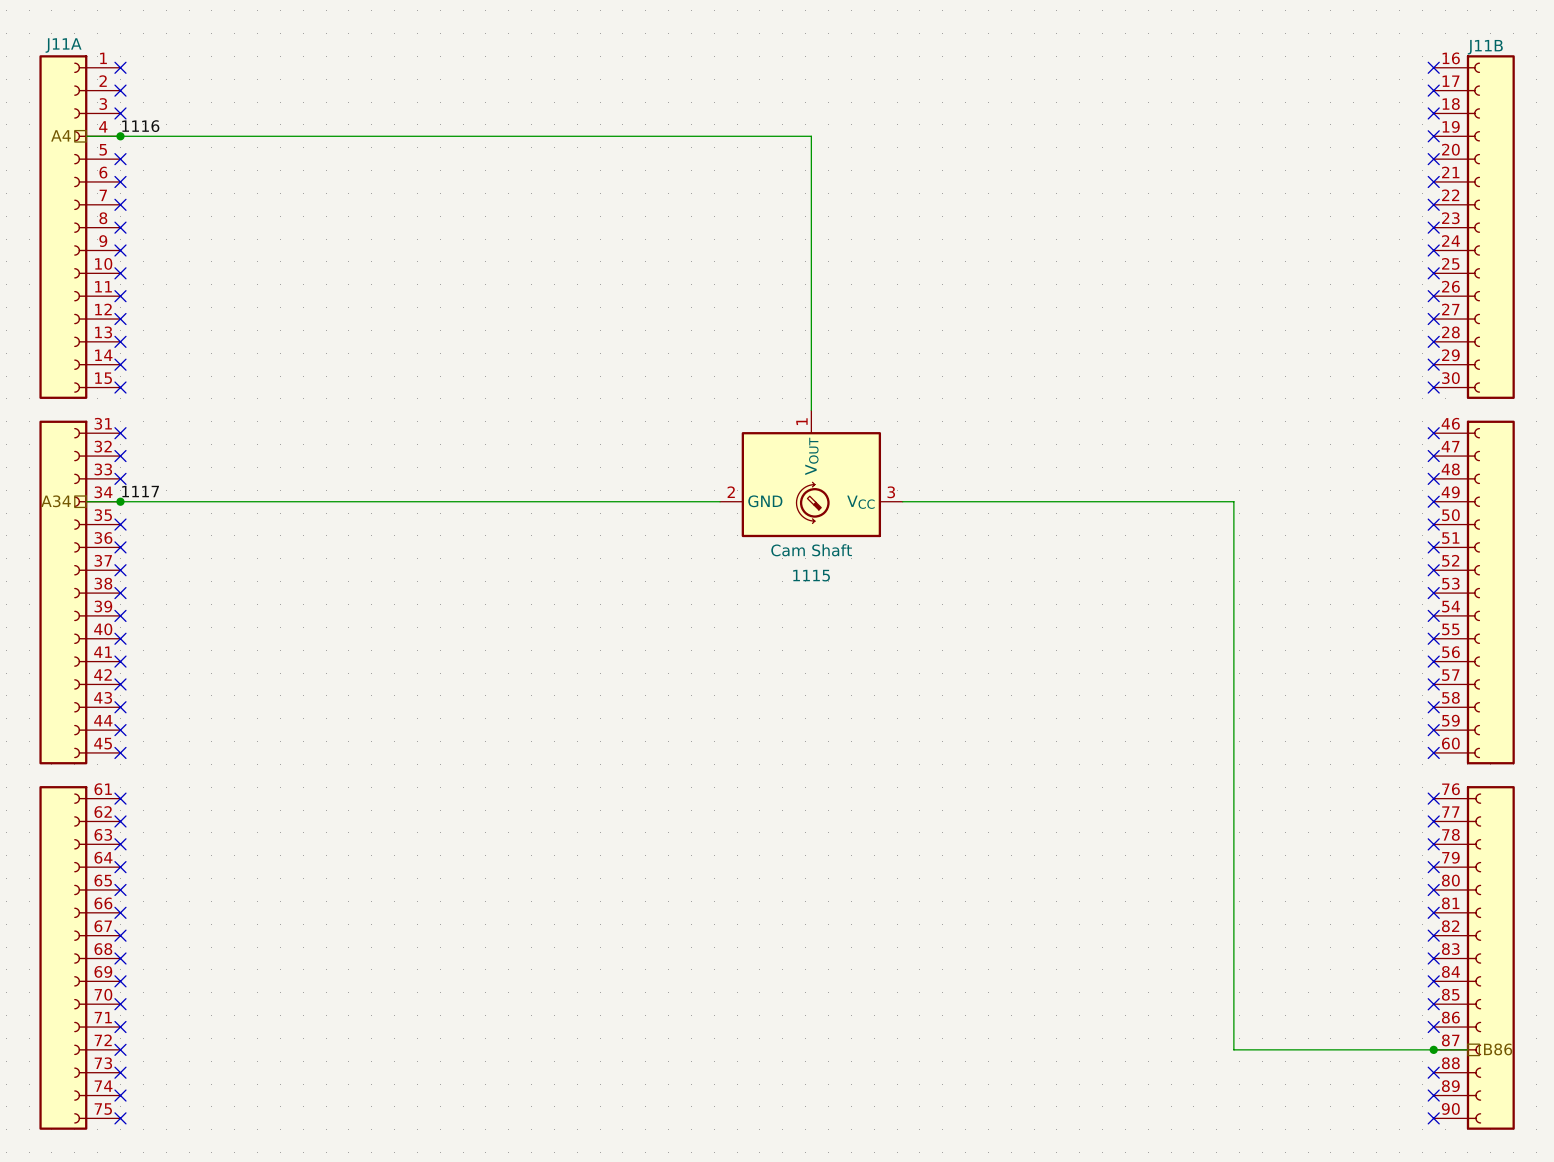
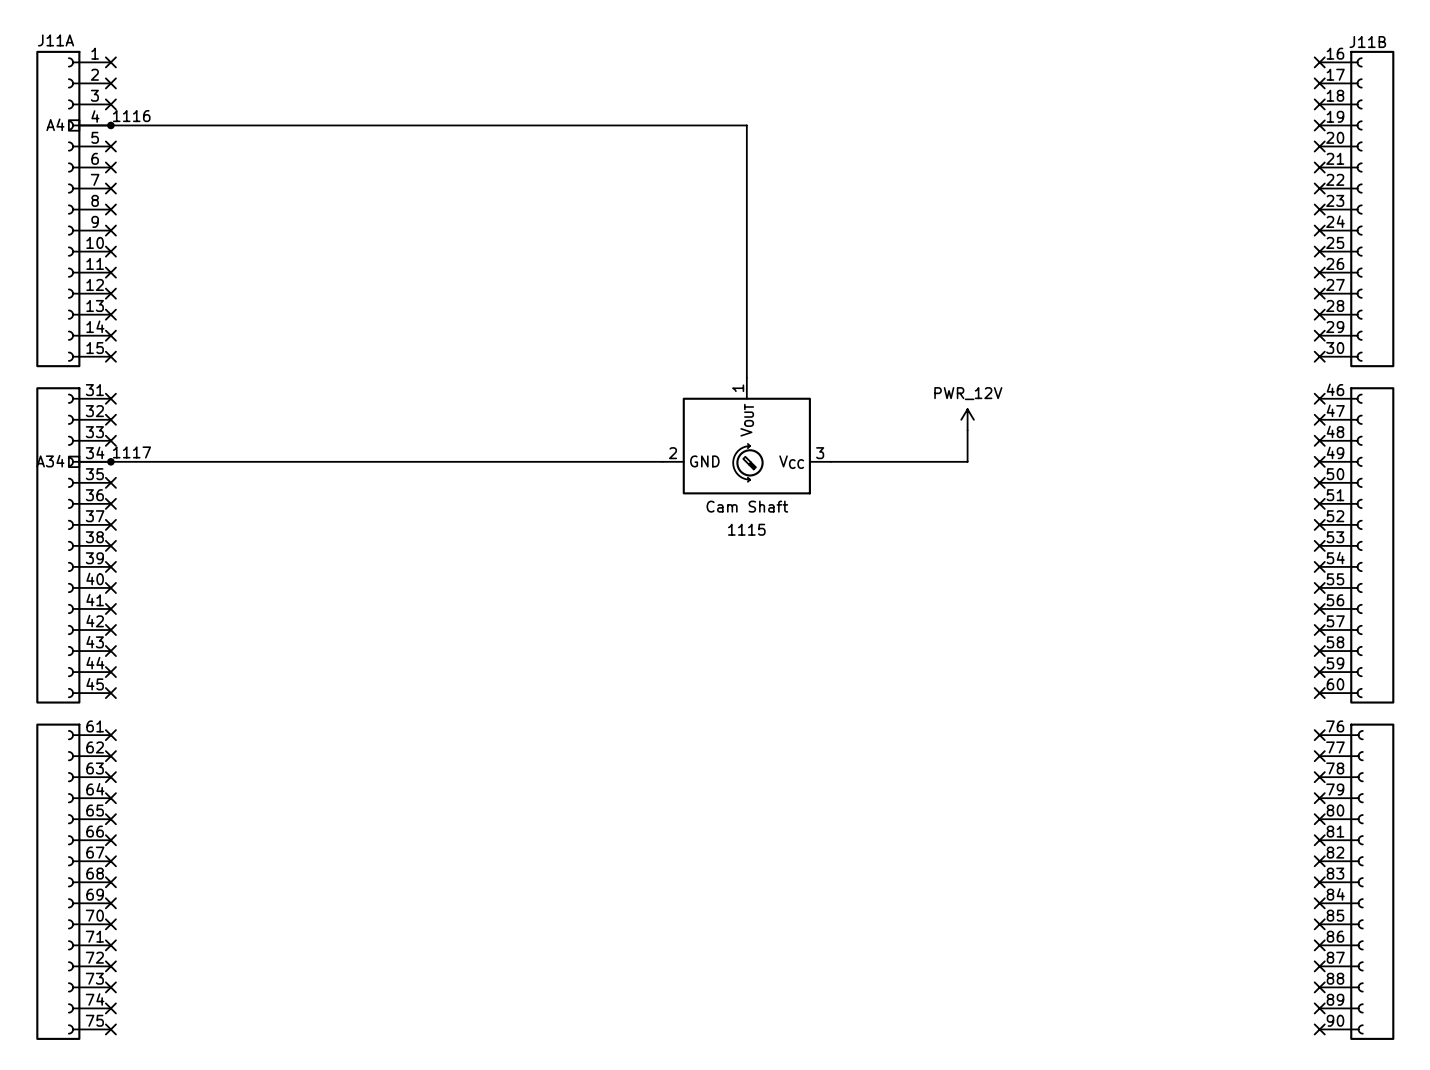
power symbol: none -> PWR_12V (967, 419)
wire: (1051, 501) (1233, 501) (1233, 1049) (1467, 1049) -> (967, 461) (967, 430)
junction: (1433, 1049) -> none
no-connect mark: none -> (1319, 966)
hierarchical label: B86 (1498, 1049) -> none

